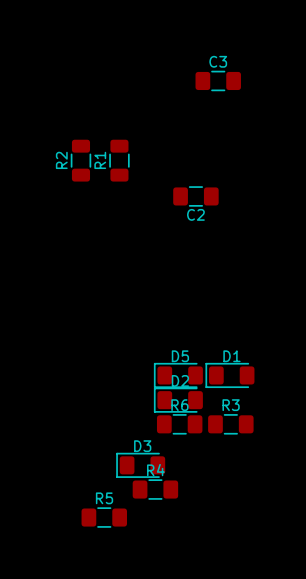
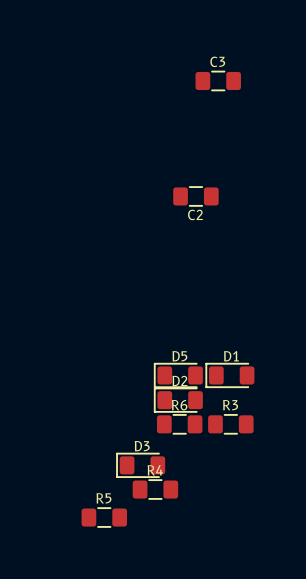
R2: (80, 160) -> none
R1: (119, 160) -> none

